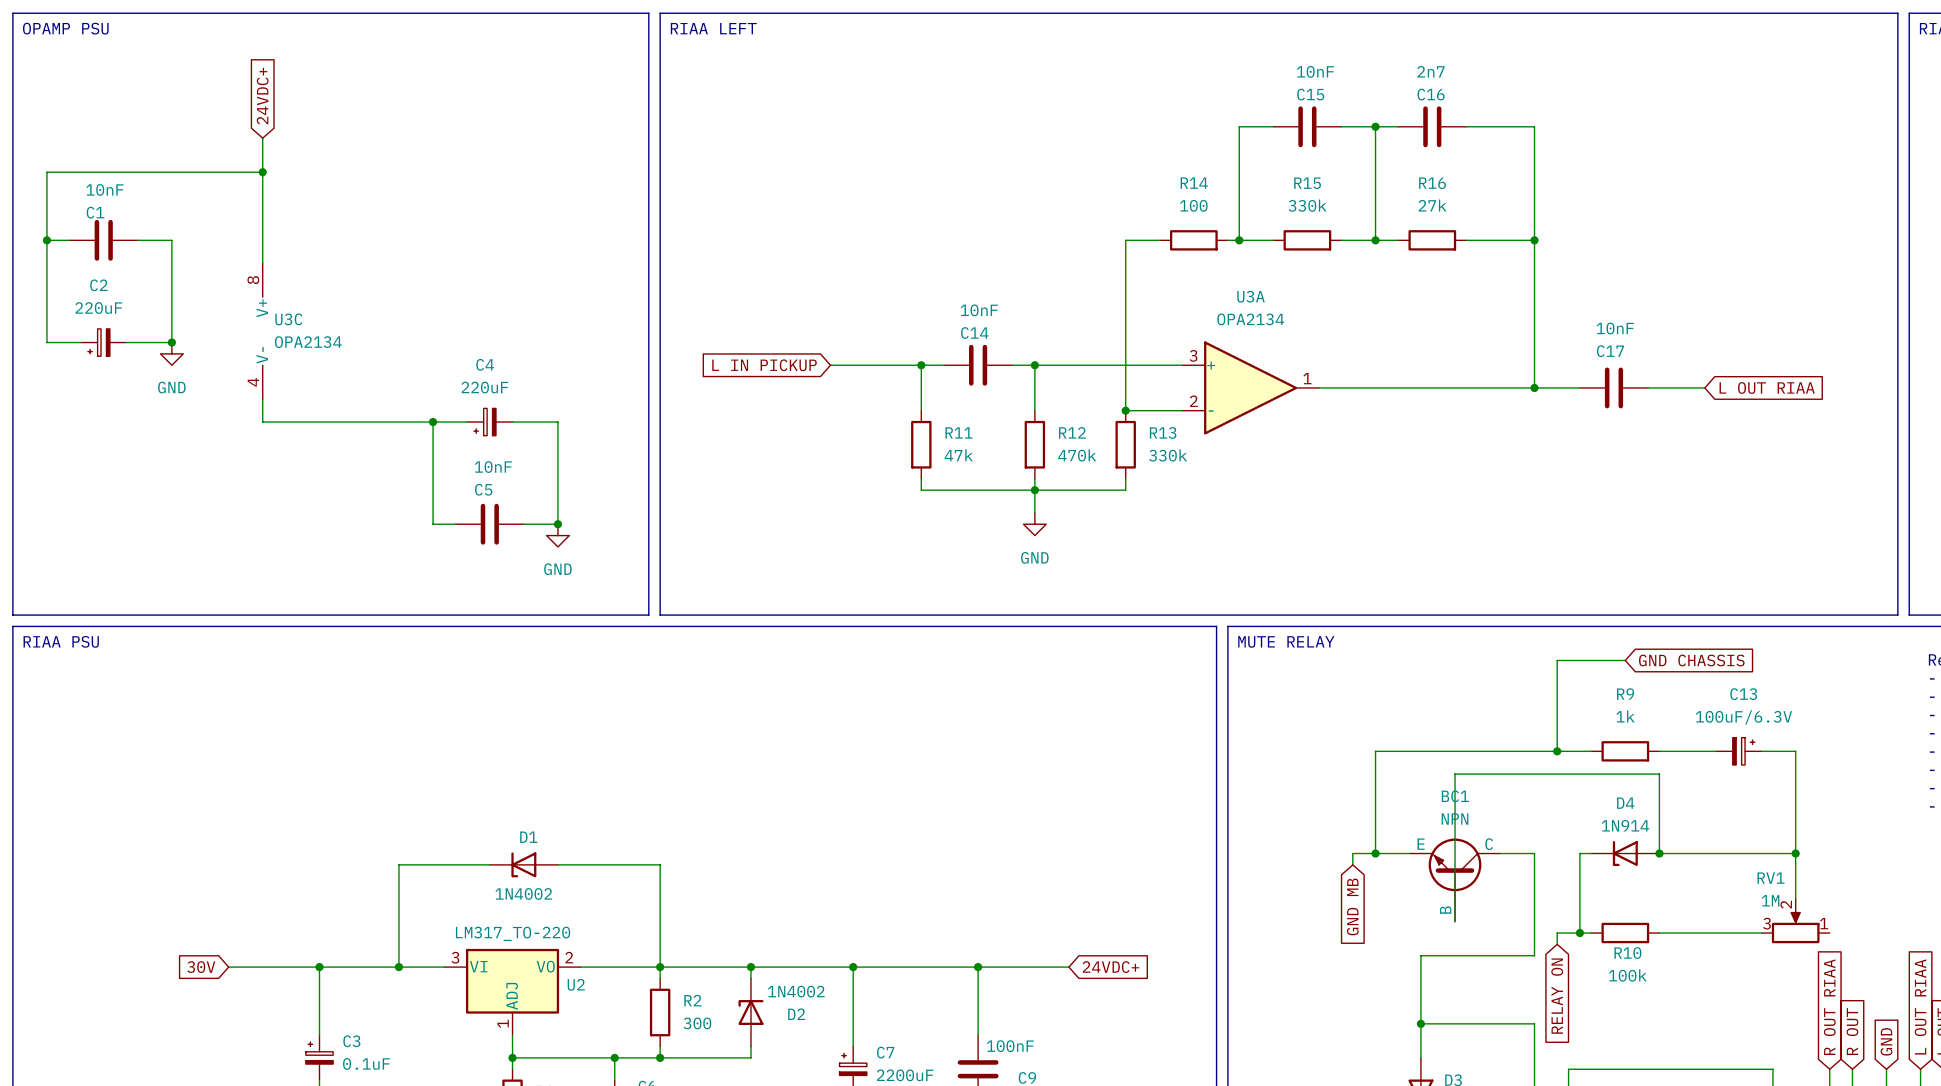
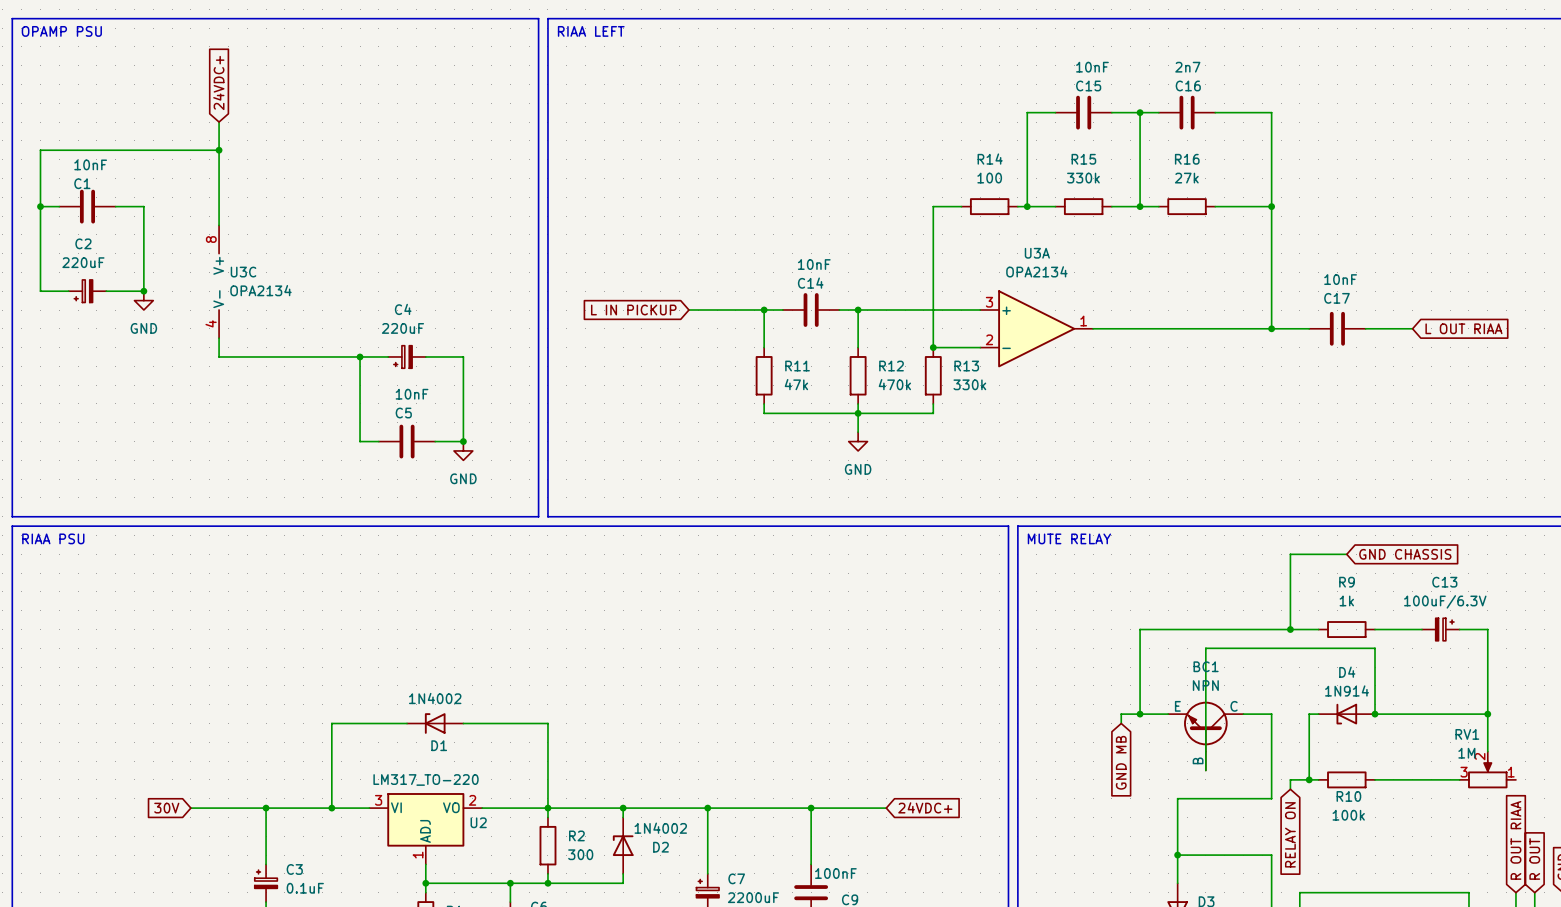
D1 flip: as is (523, 864) -> up-down (435, 723)

